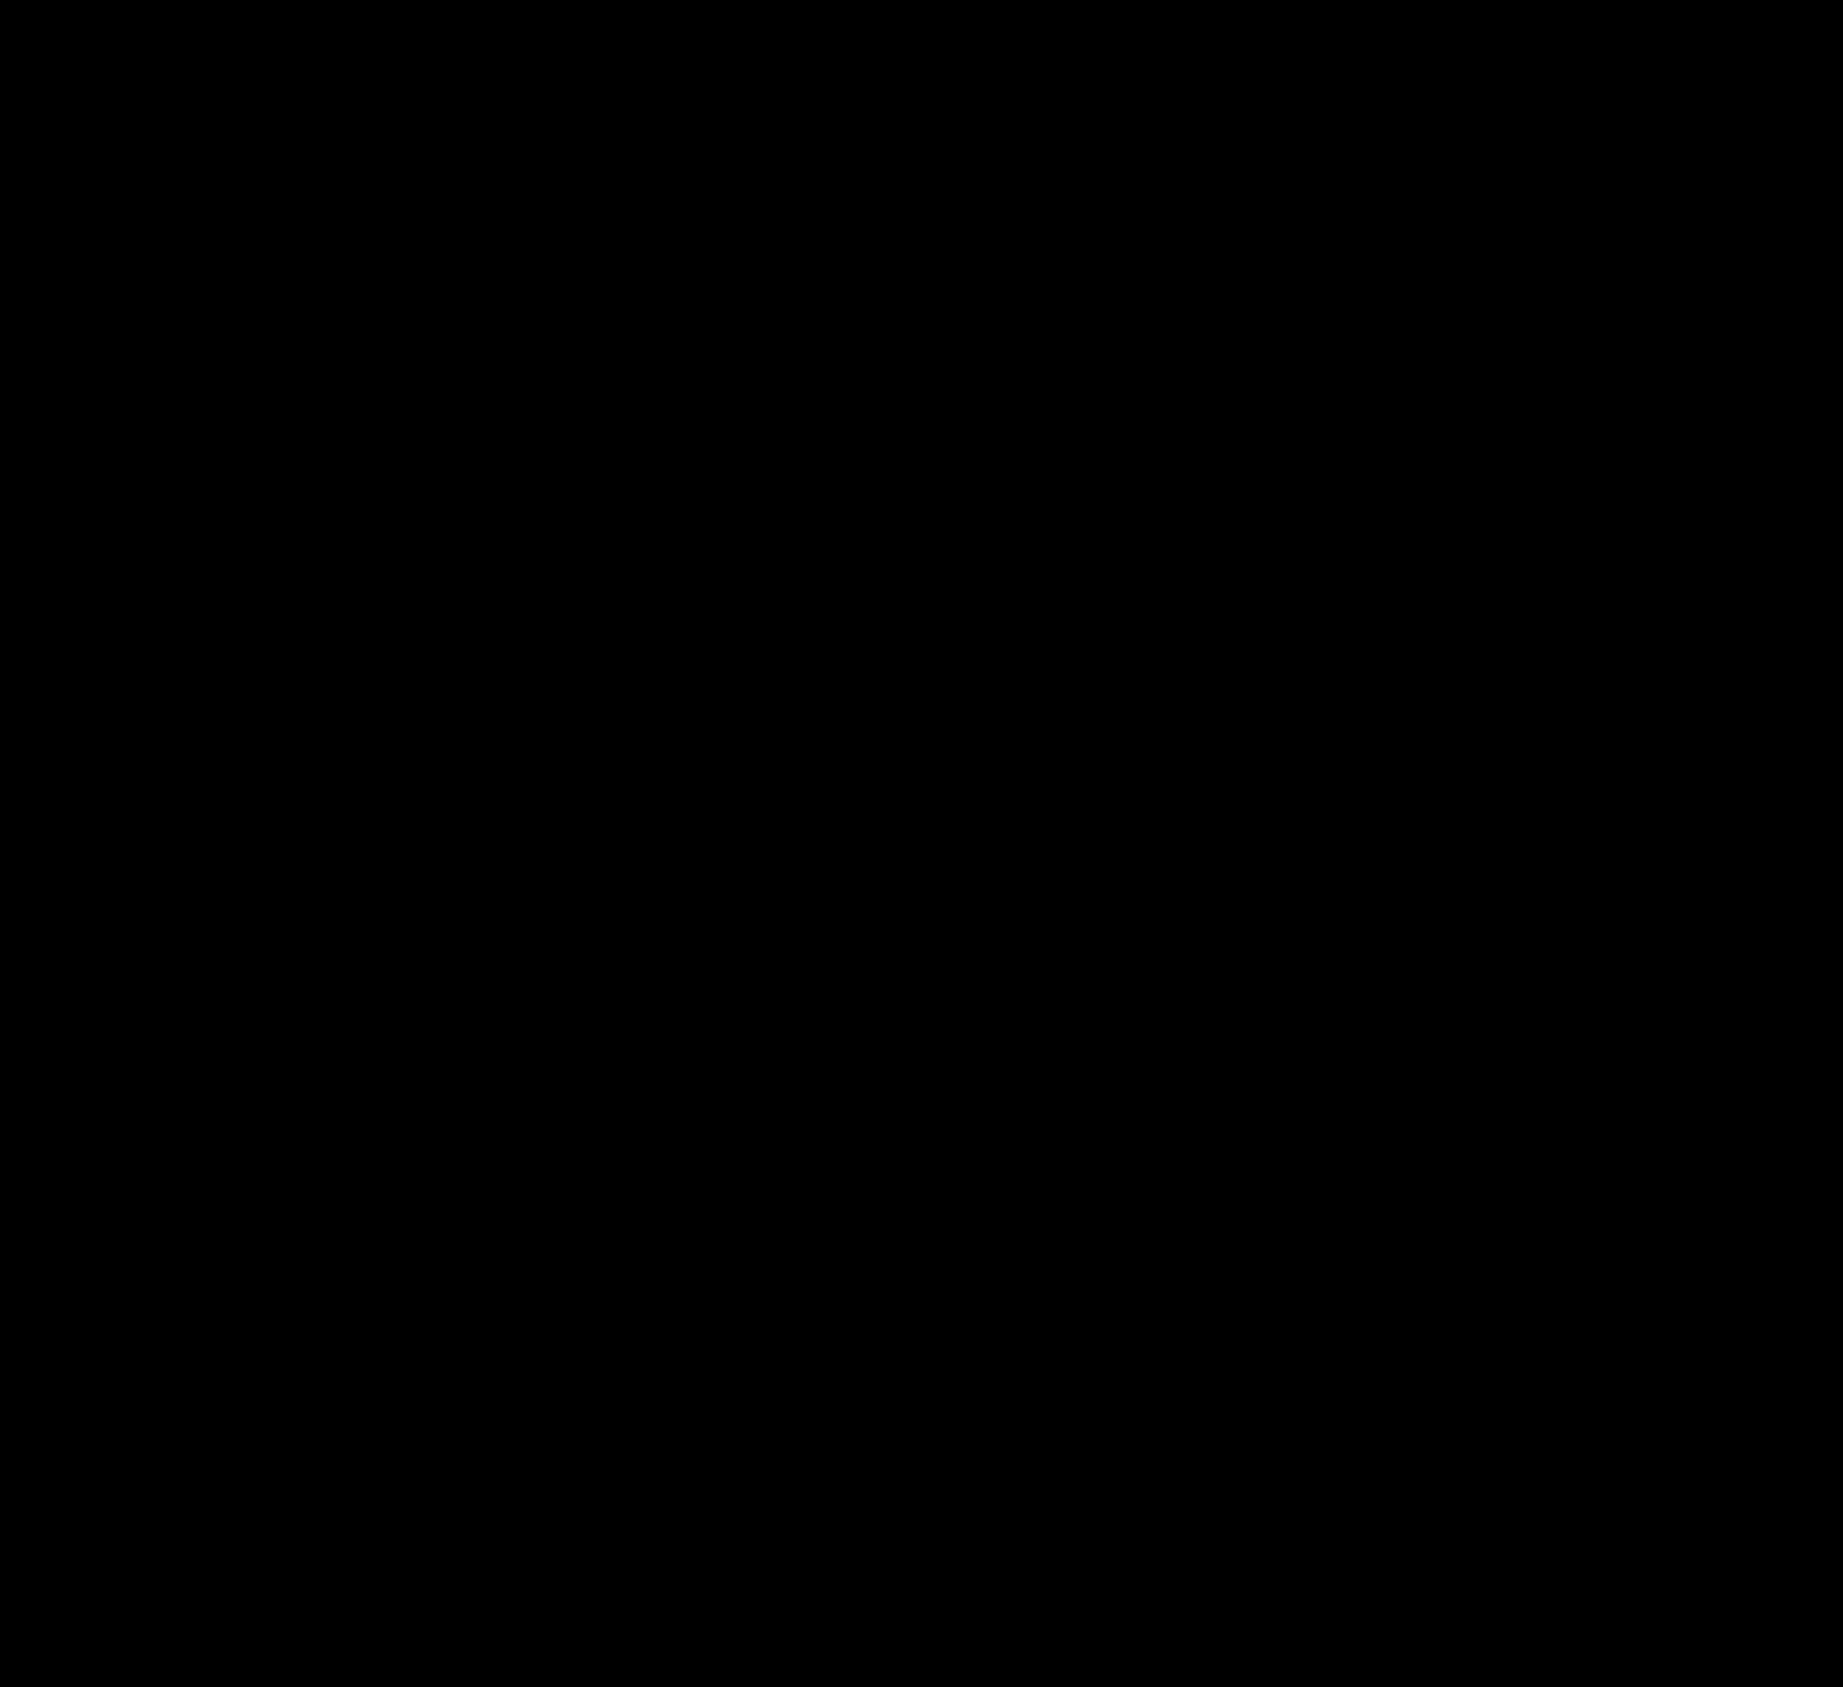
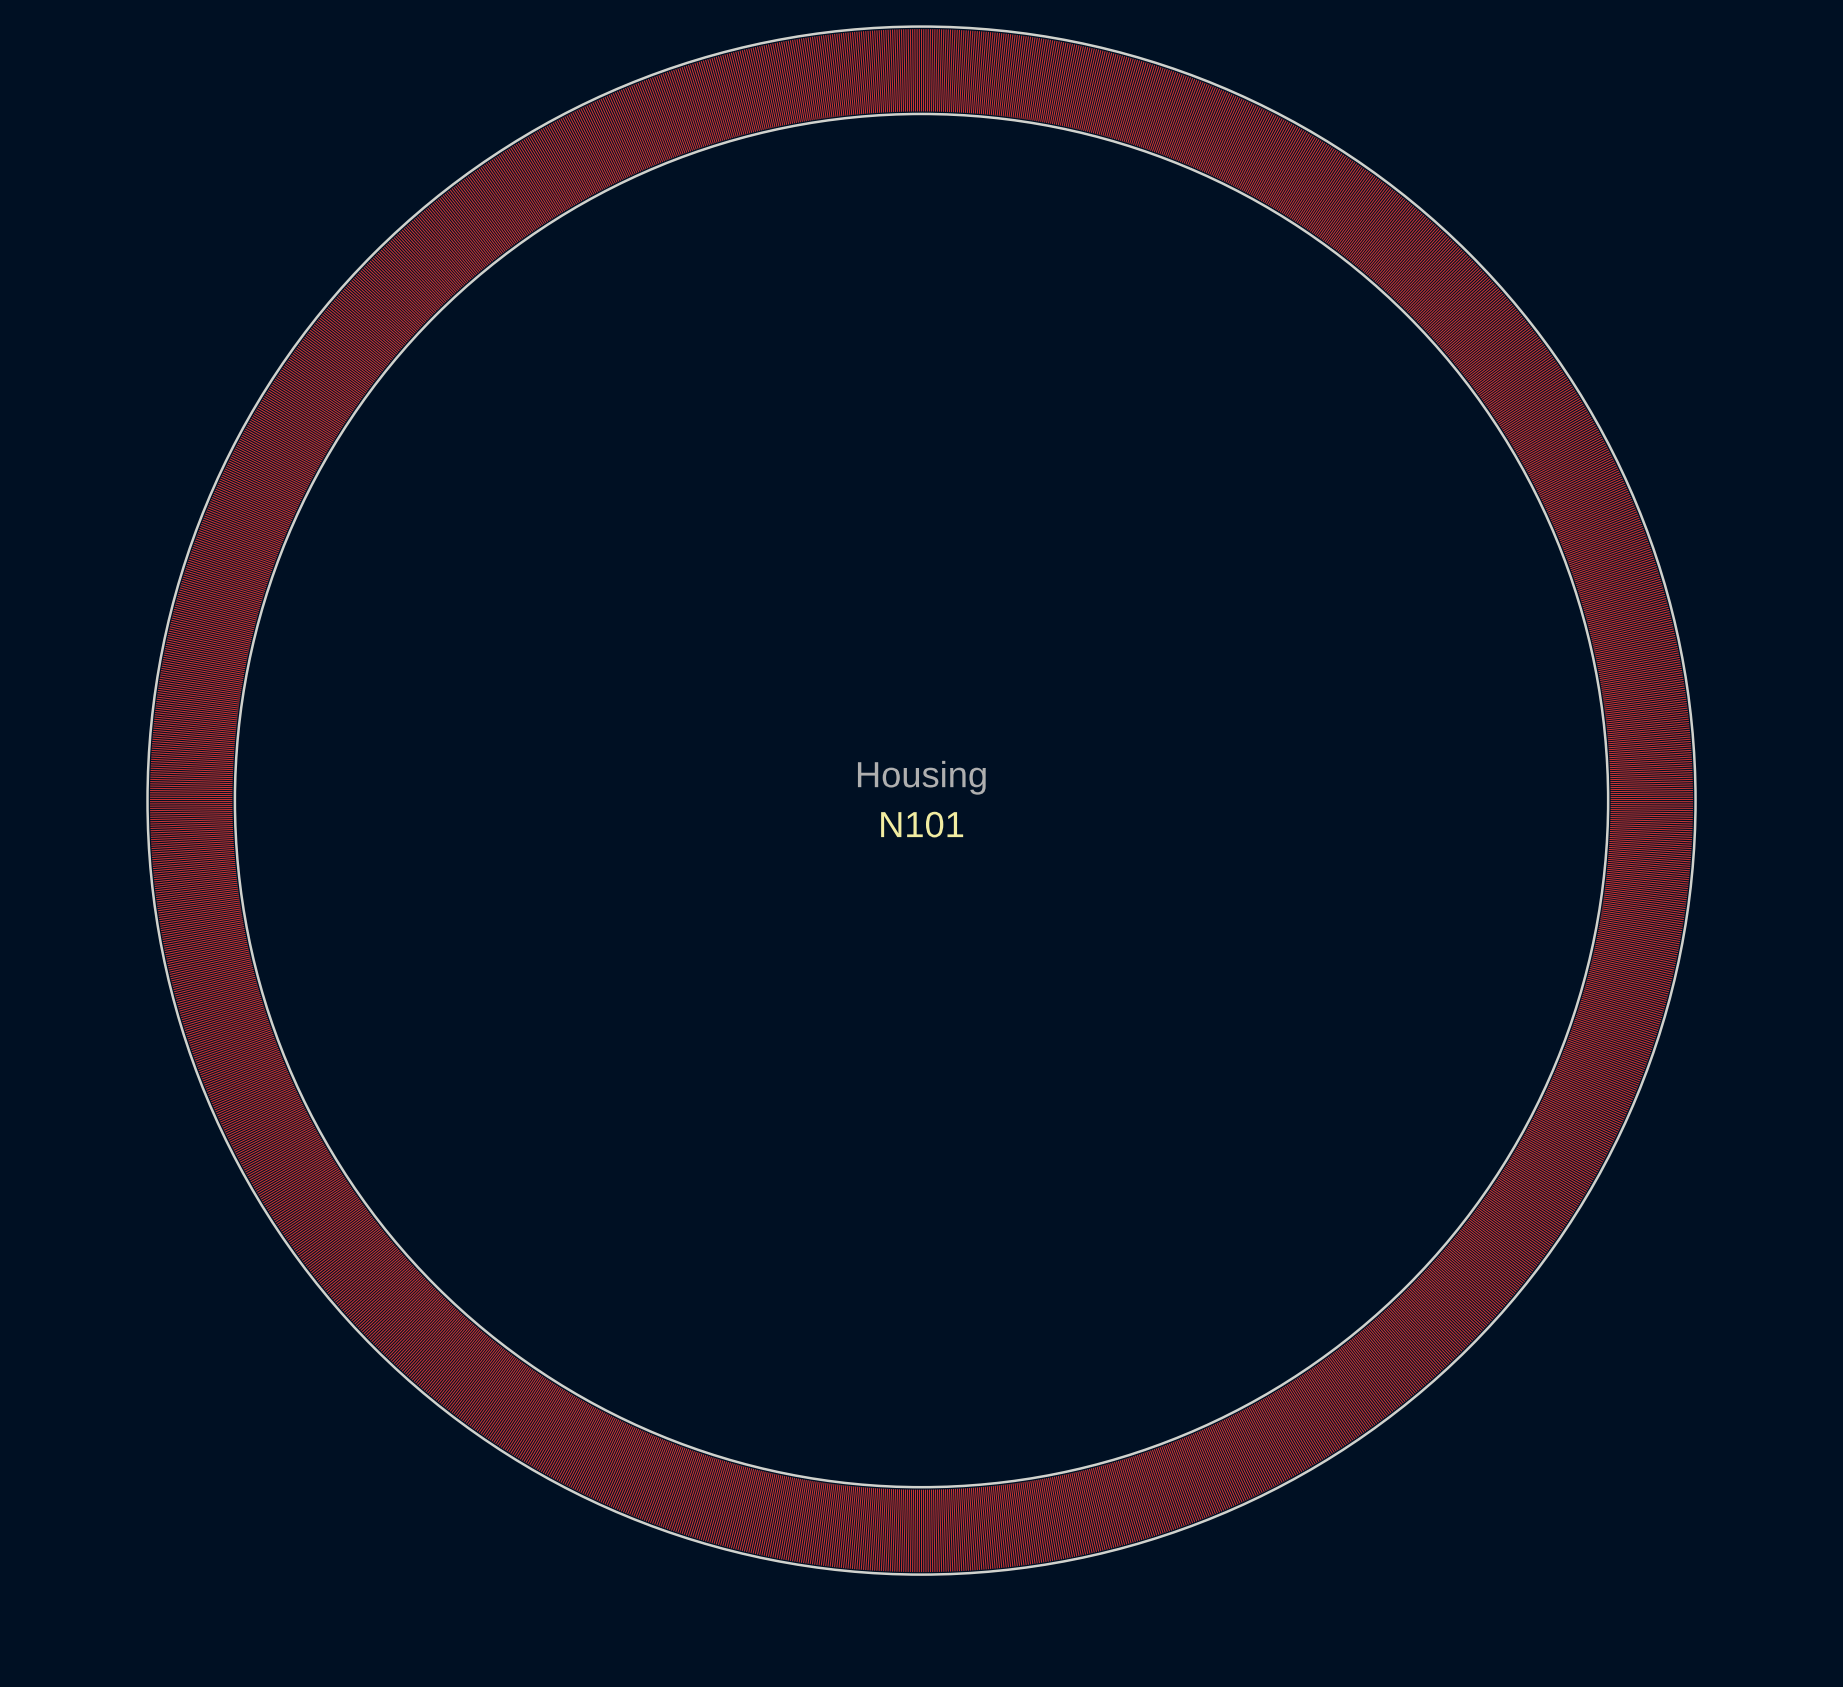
round board edge: none -> [146, 25, 1697, 1576]
round board edge: none -> [233, 112, 1610, 1489]
N101: none -> Housing (921, 800)

